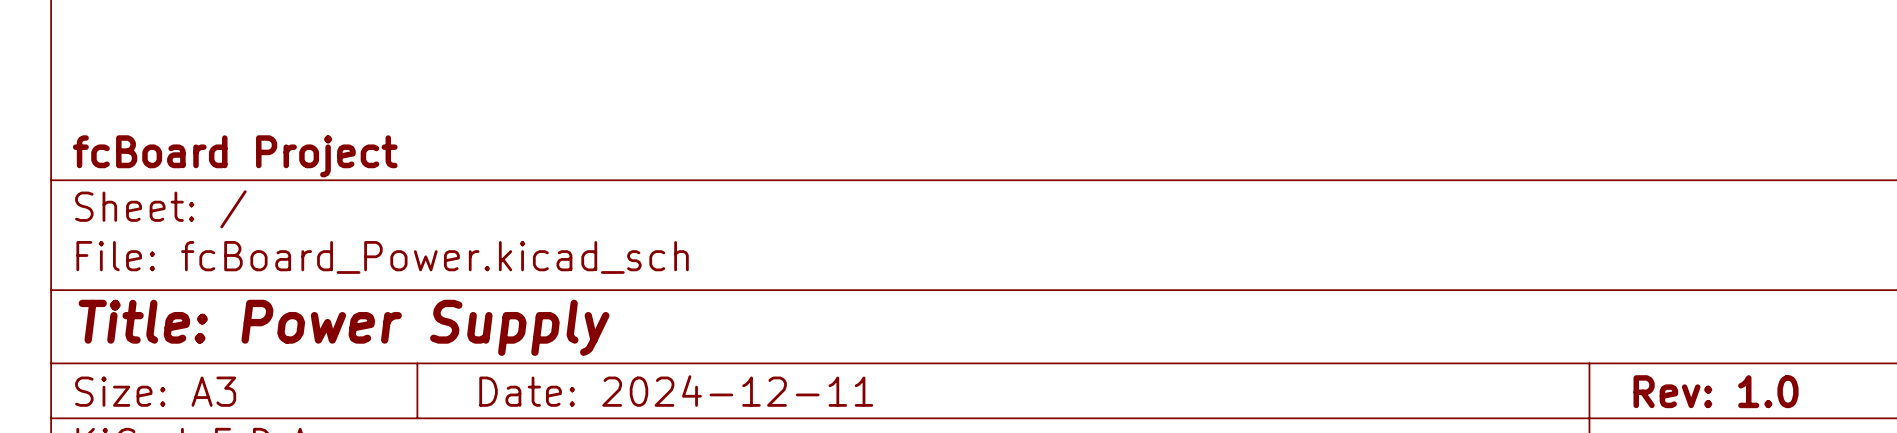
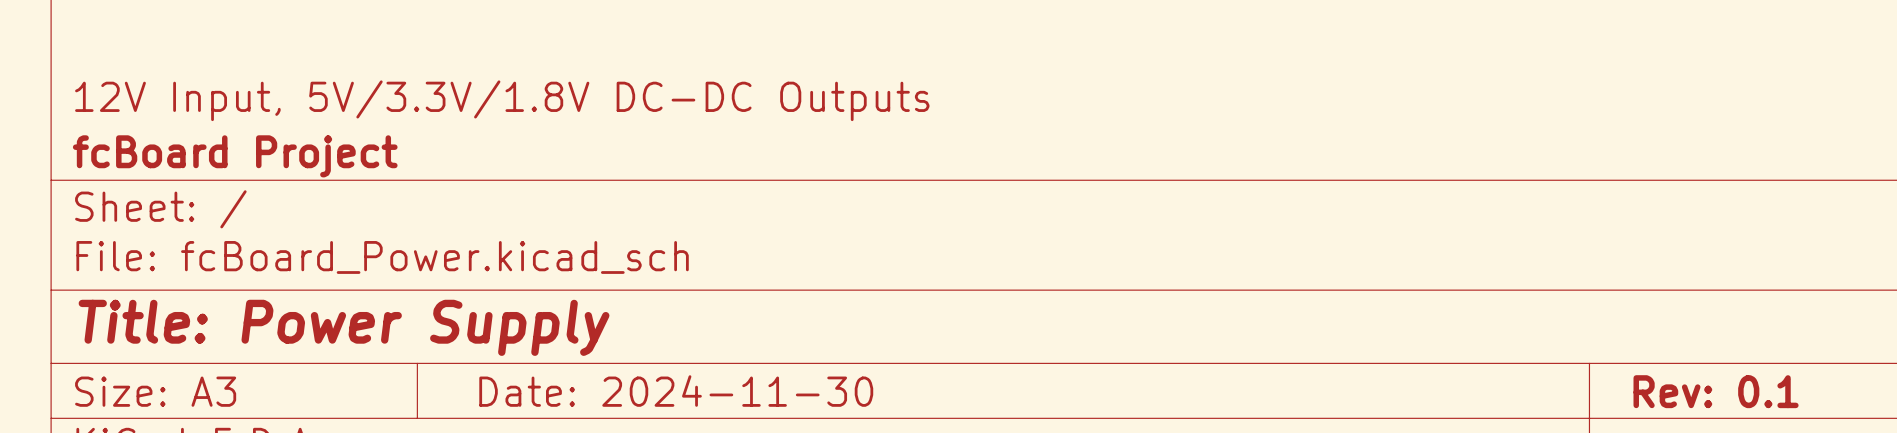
title block: none -> 12V Input, 5V/3.3V/1.8V DC-DC Outputs (502, 100)
title block: Date: 2024-12-11 (676, 391) -> Date: 2024-11-30 (676, 391)
title block: Rev: 1.0 (1716, 391) -> Rev: 0.1 (1716, 391)

